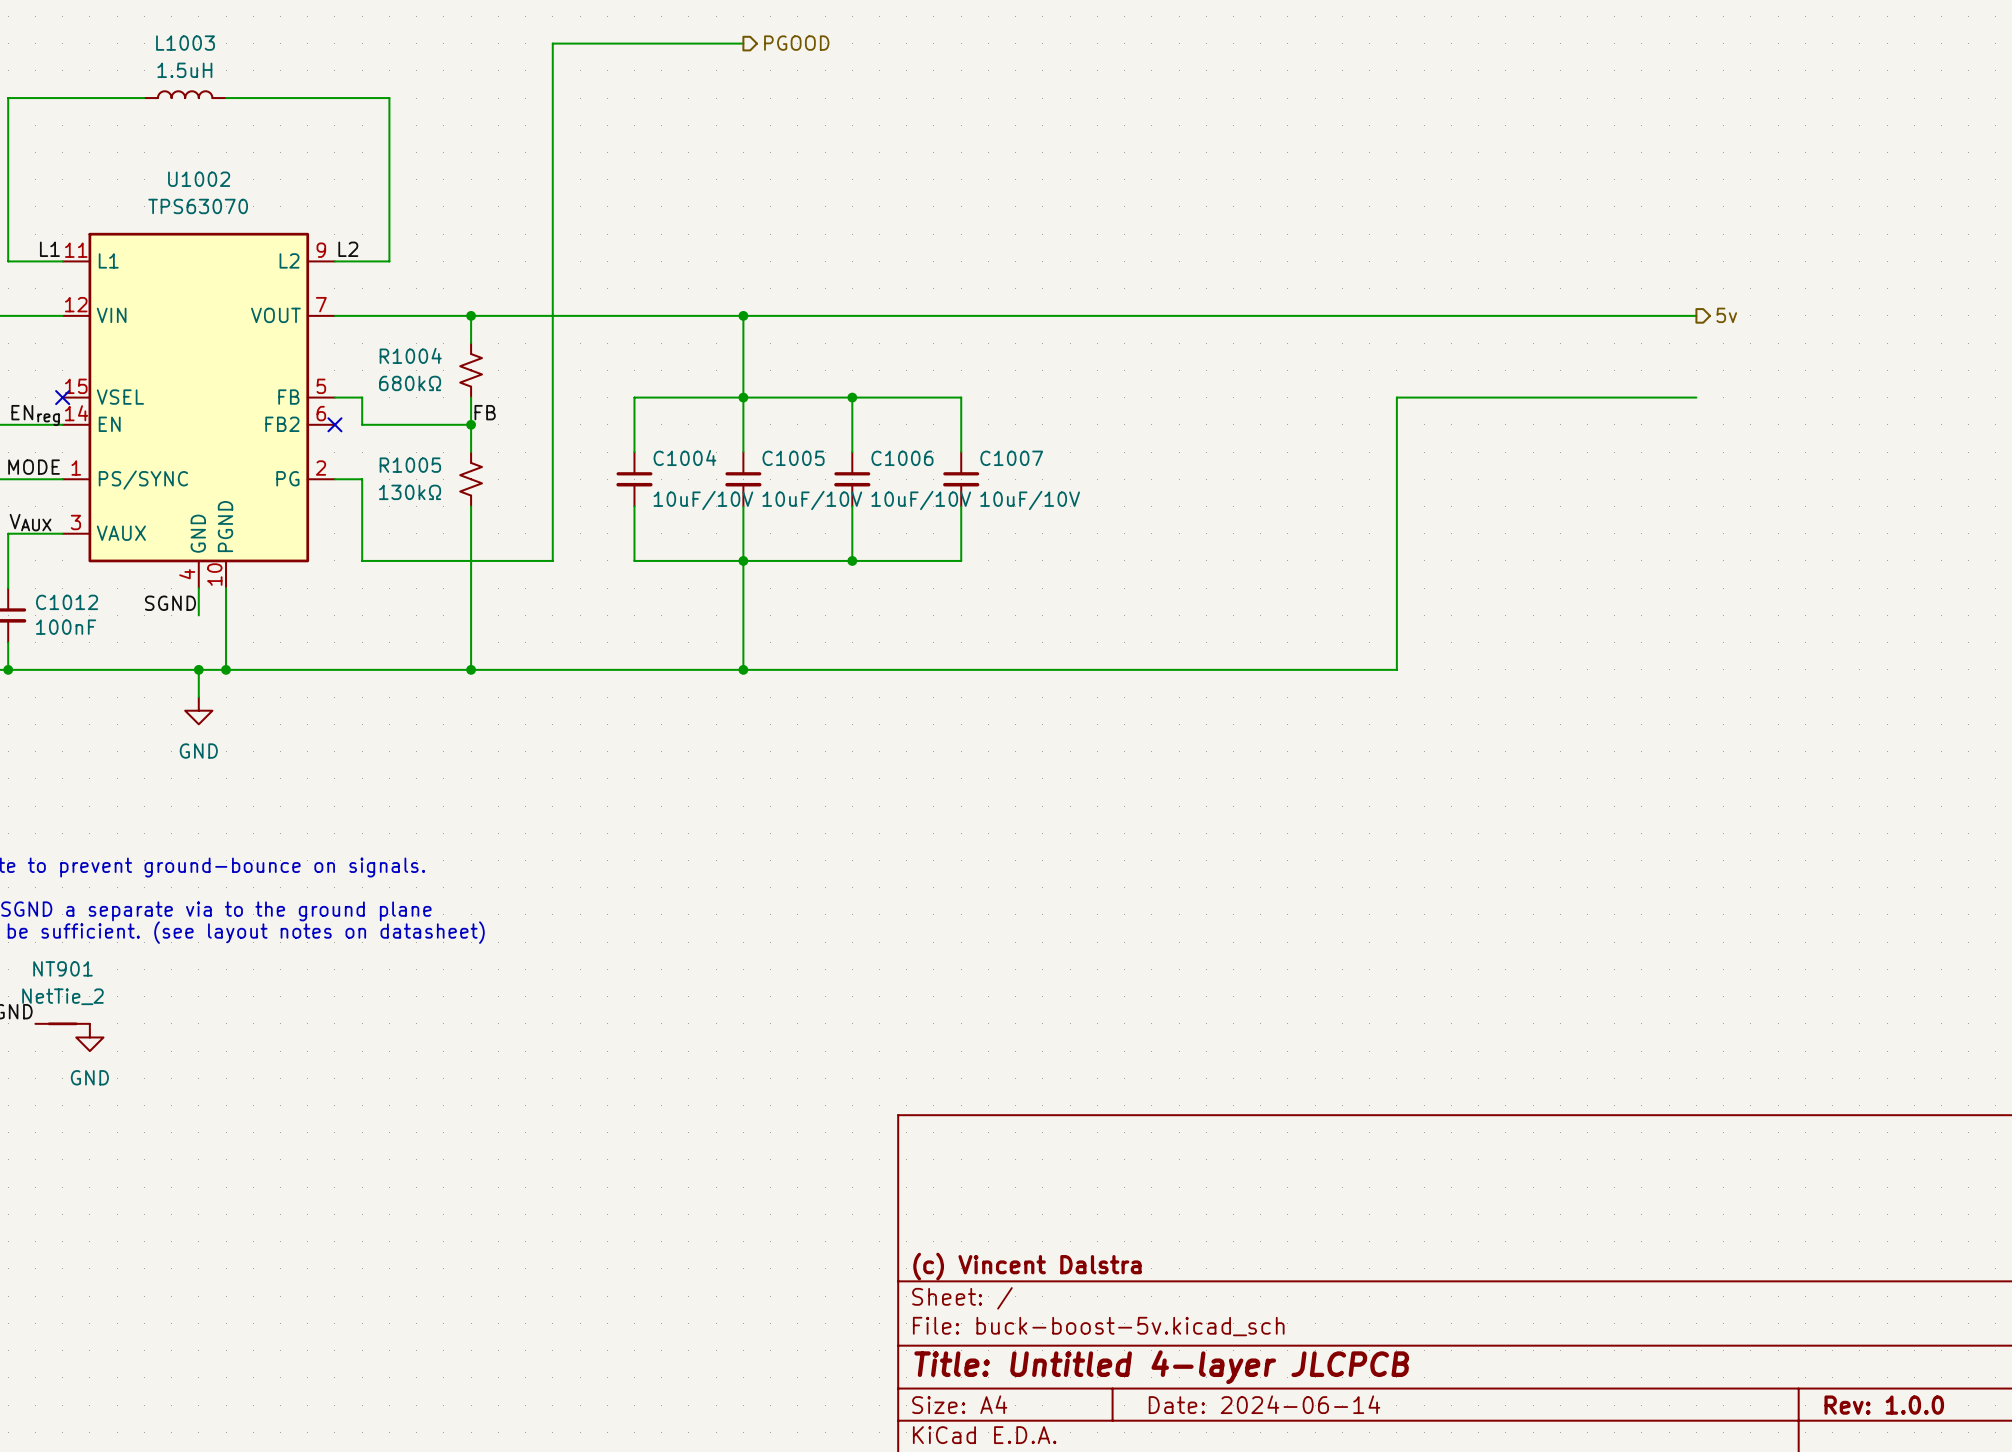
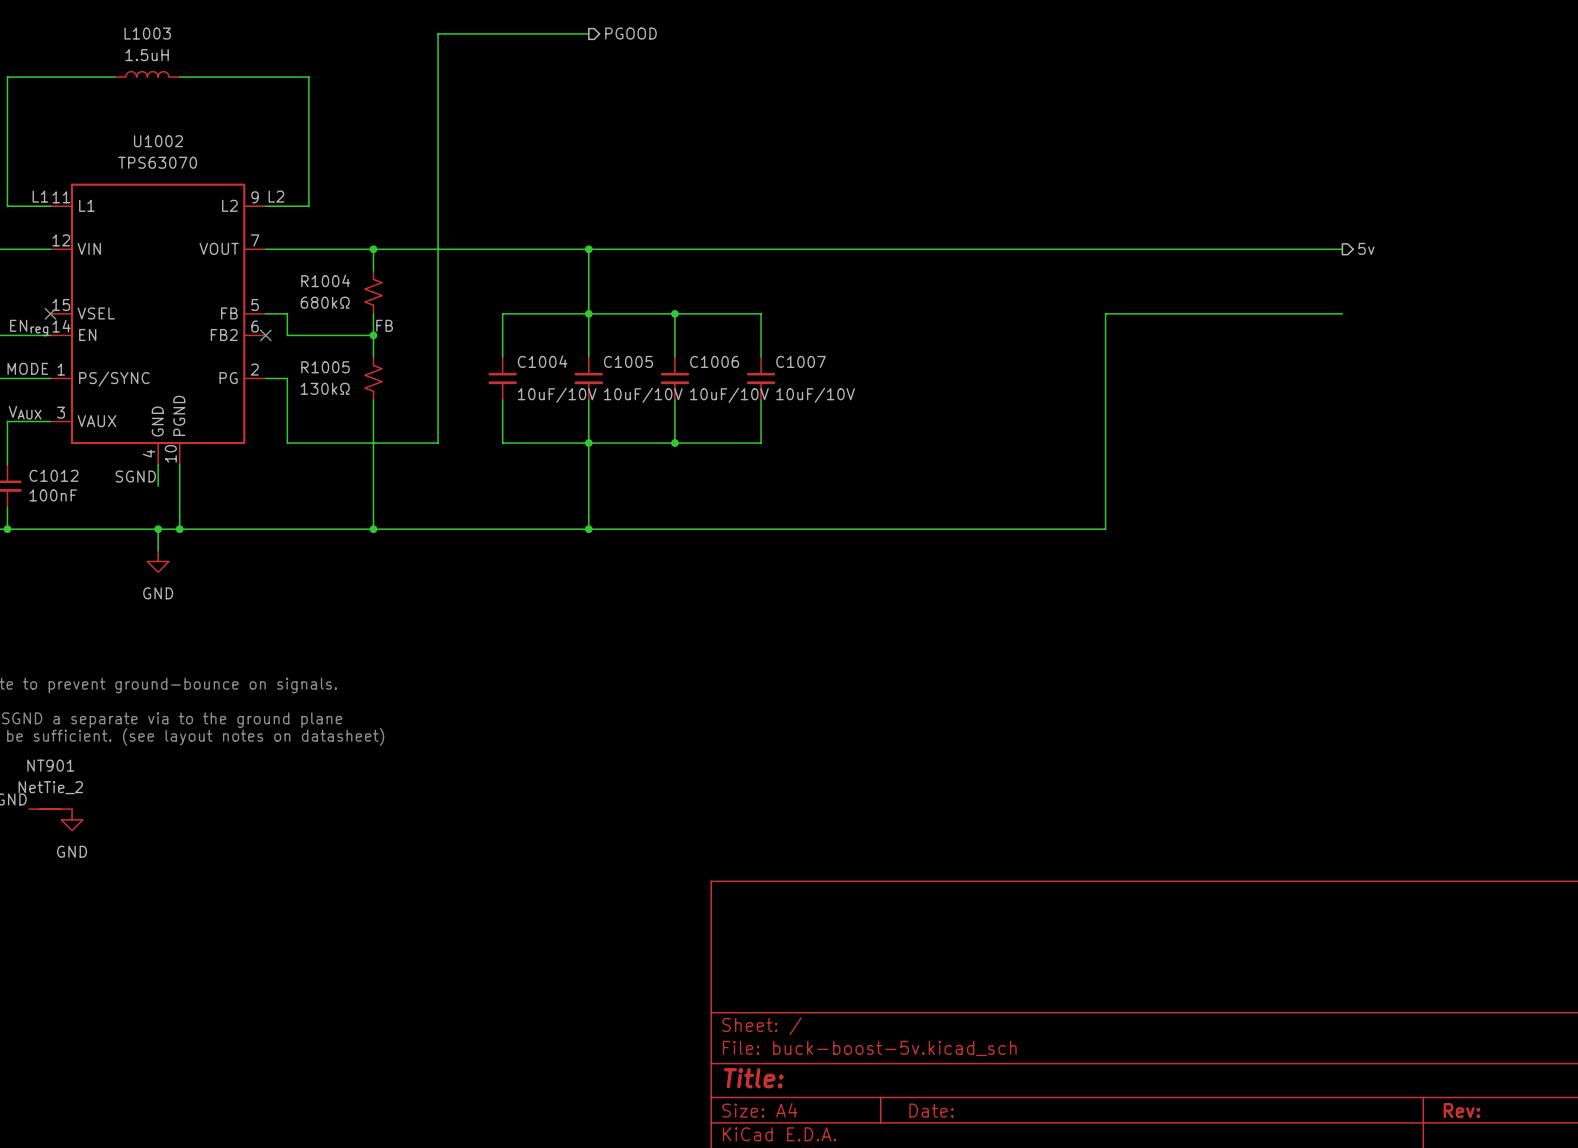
title block: (c) Vincent Dalstra (1027, 1266) -> none
title block: Title: Untitled 4-layer JLCPCB (1161, 1367) -> Title: (753, 1078)
title block: Date: 2024-06-14 (1264, 1404) -> Date: (931, 1110)
title block: Rev: 1.0.0 (1884, 1405) -> Rev: (1461, 1110)

